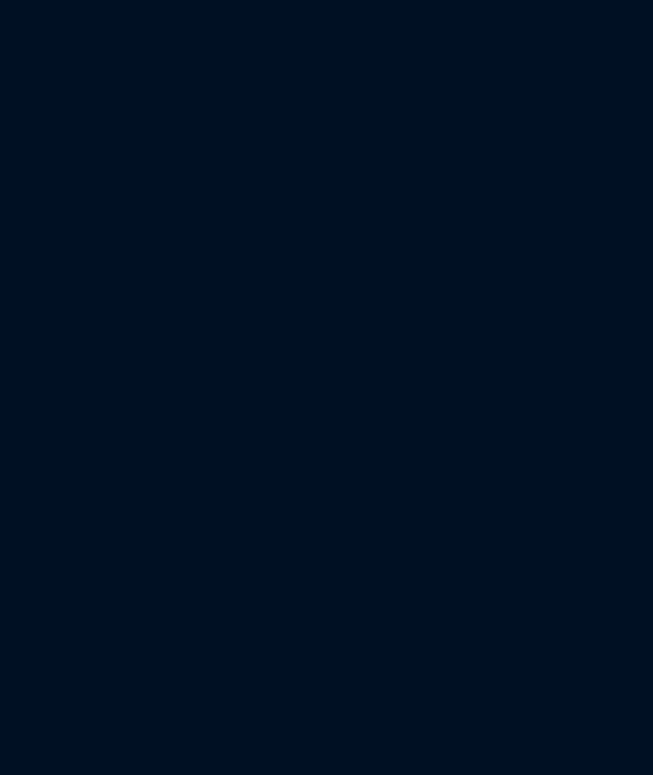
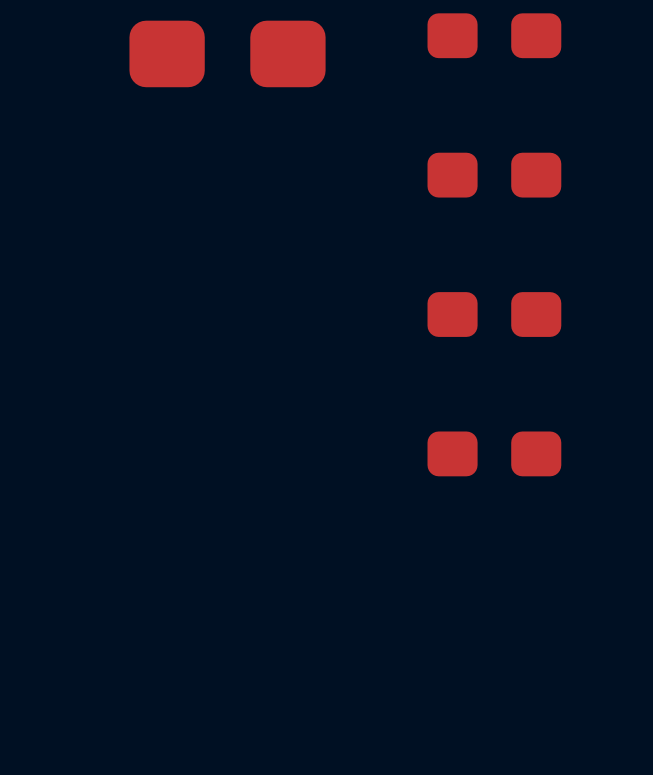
part: none -> (494, 35)
part: none -> (227, 53)
part: none -> (494, 175)
part: none -> (494, 314)
part: none -> (494, 453)

